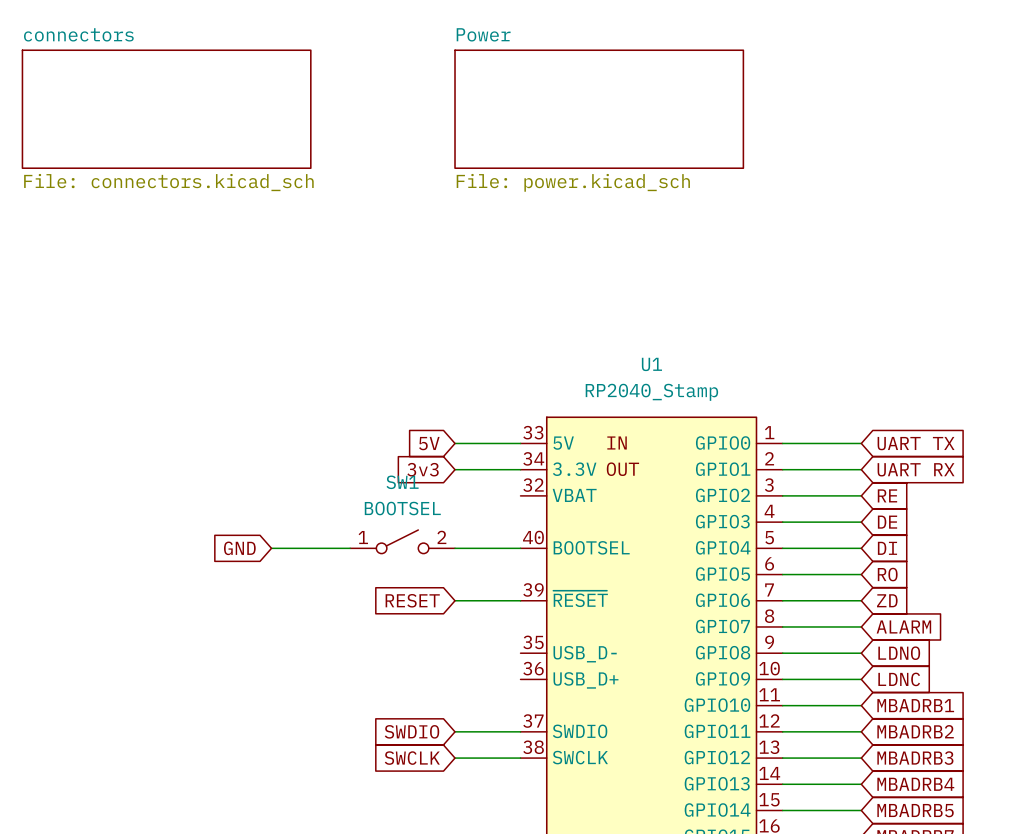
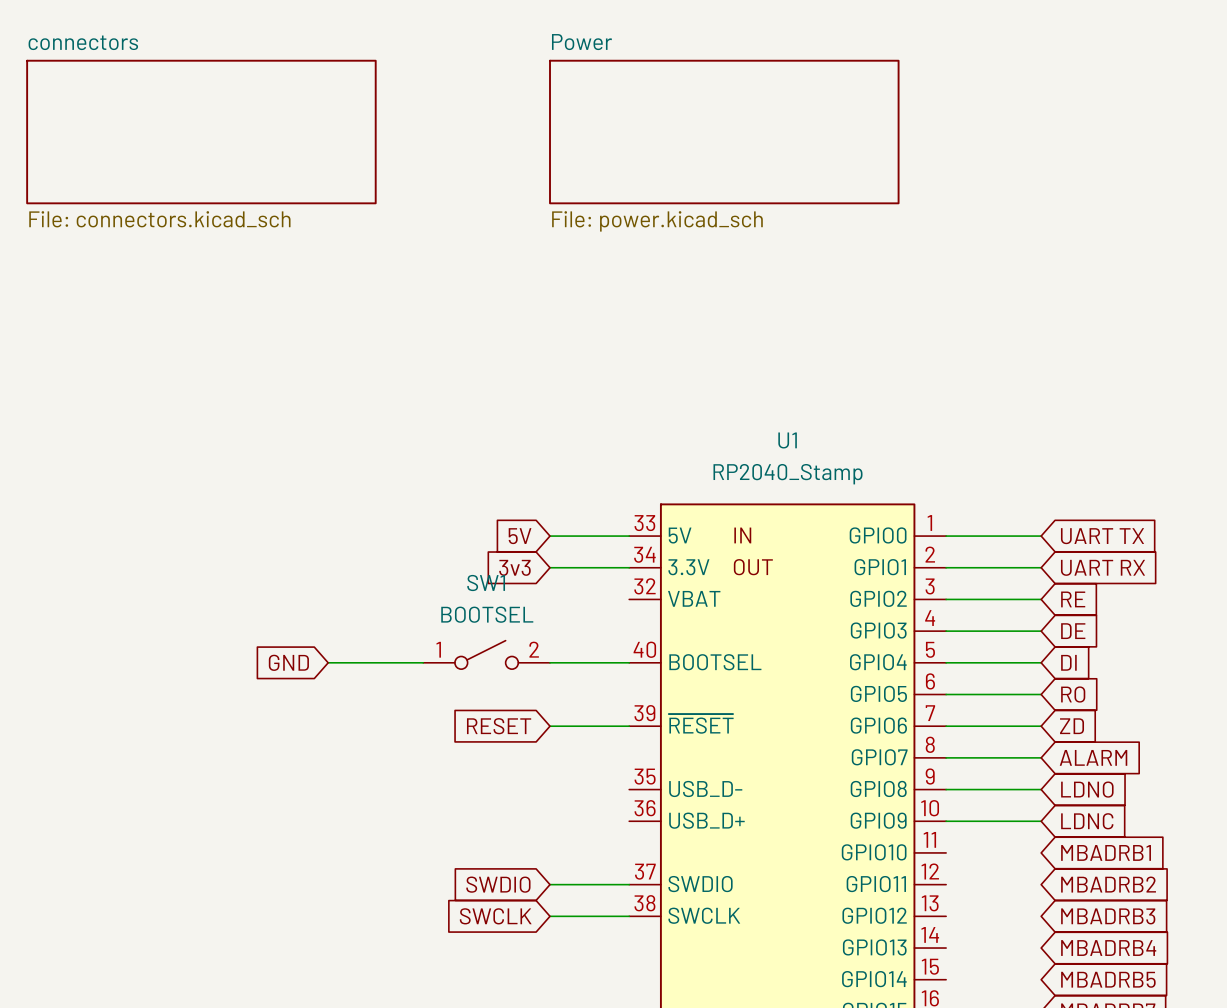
wire: (782, 705) (861, 705) -> none
wire: (782, 731) (861, 731) -> none
wire: (782, 758) (861, 758) -> none
wire: (782, 784) (861, 784) -> none
wire: (782, 810) (861, 810) -> none

